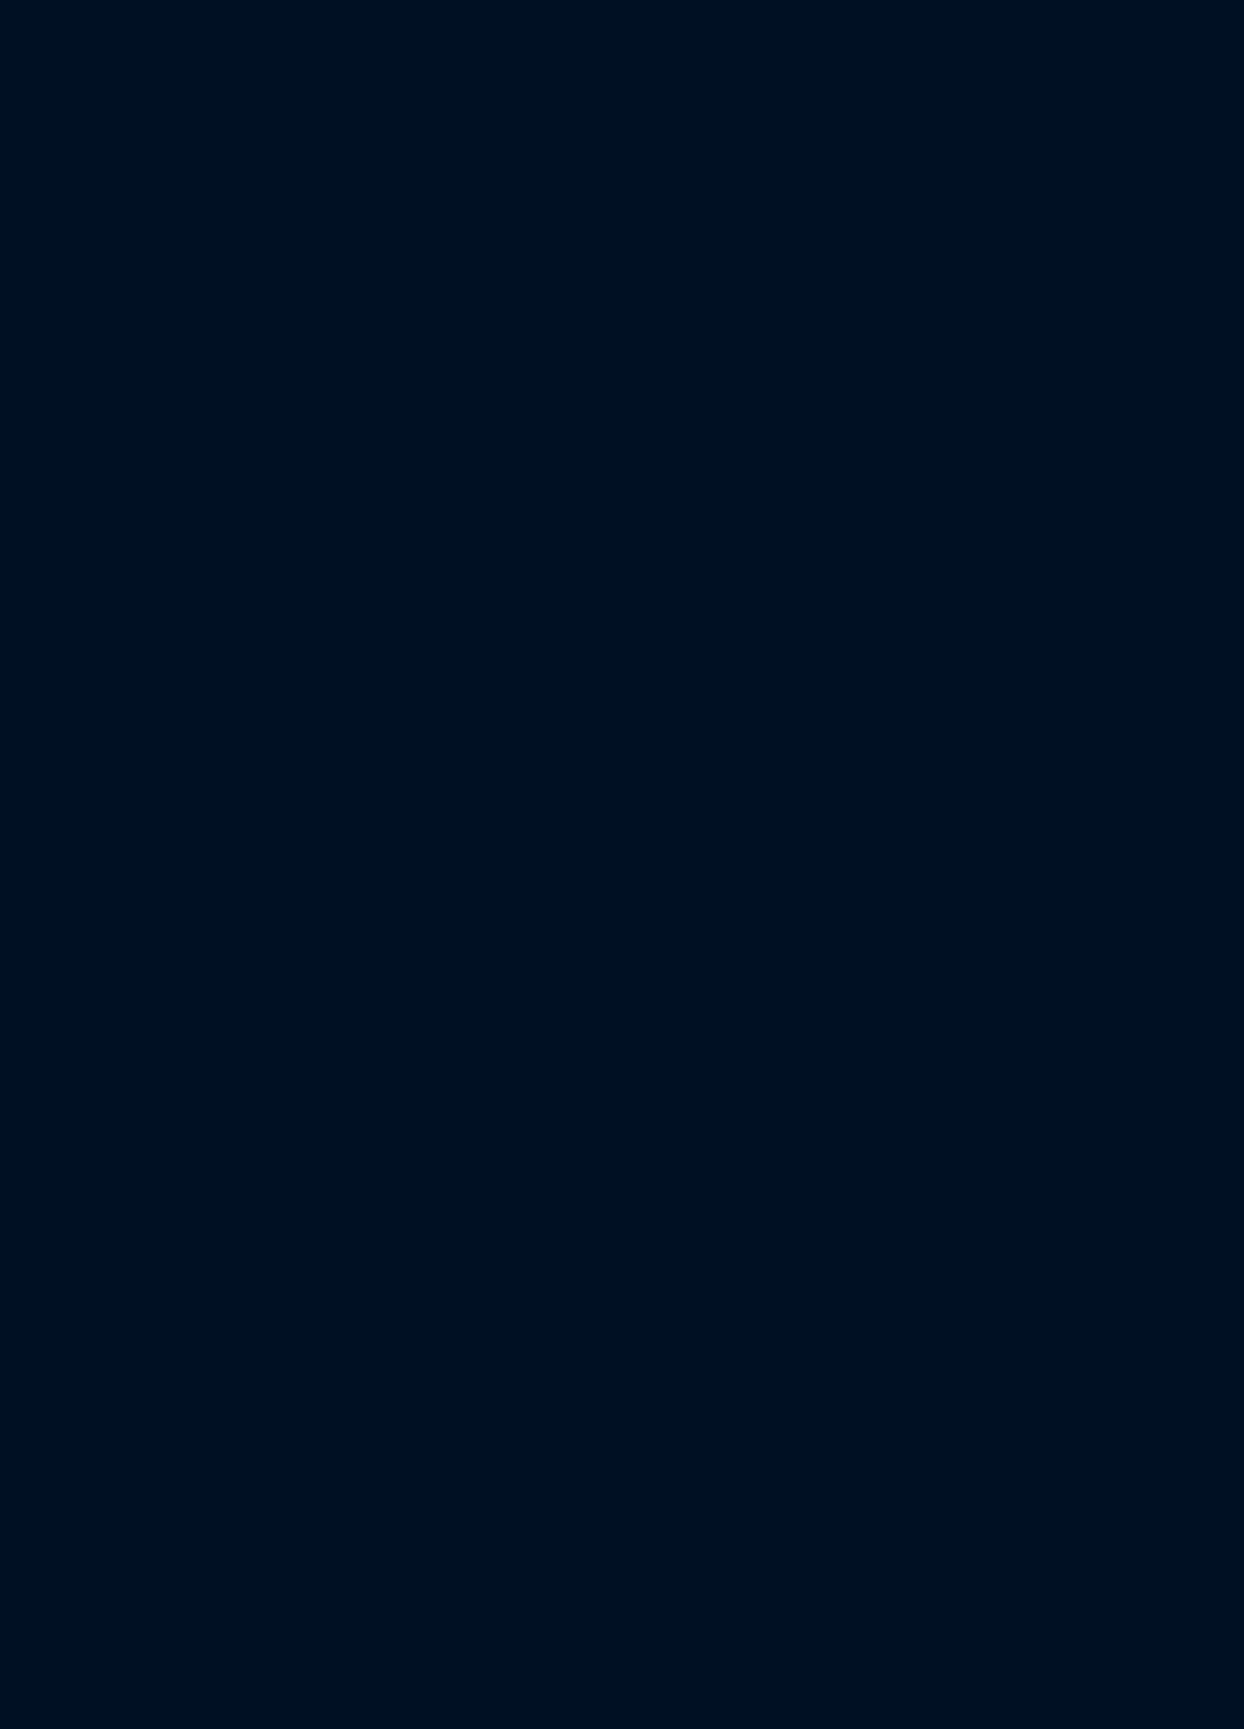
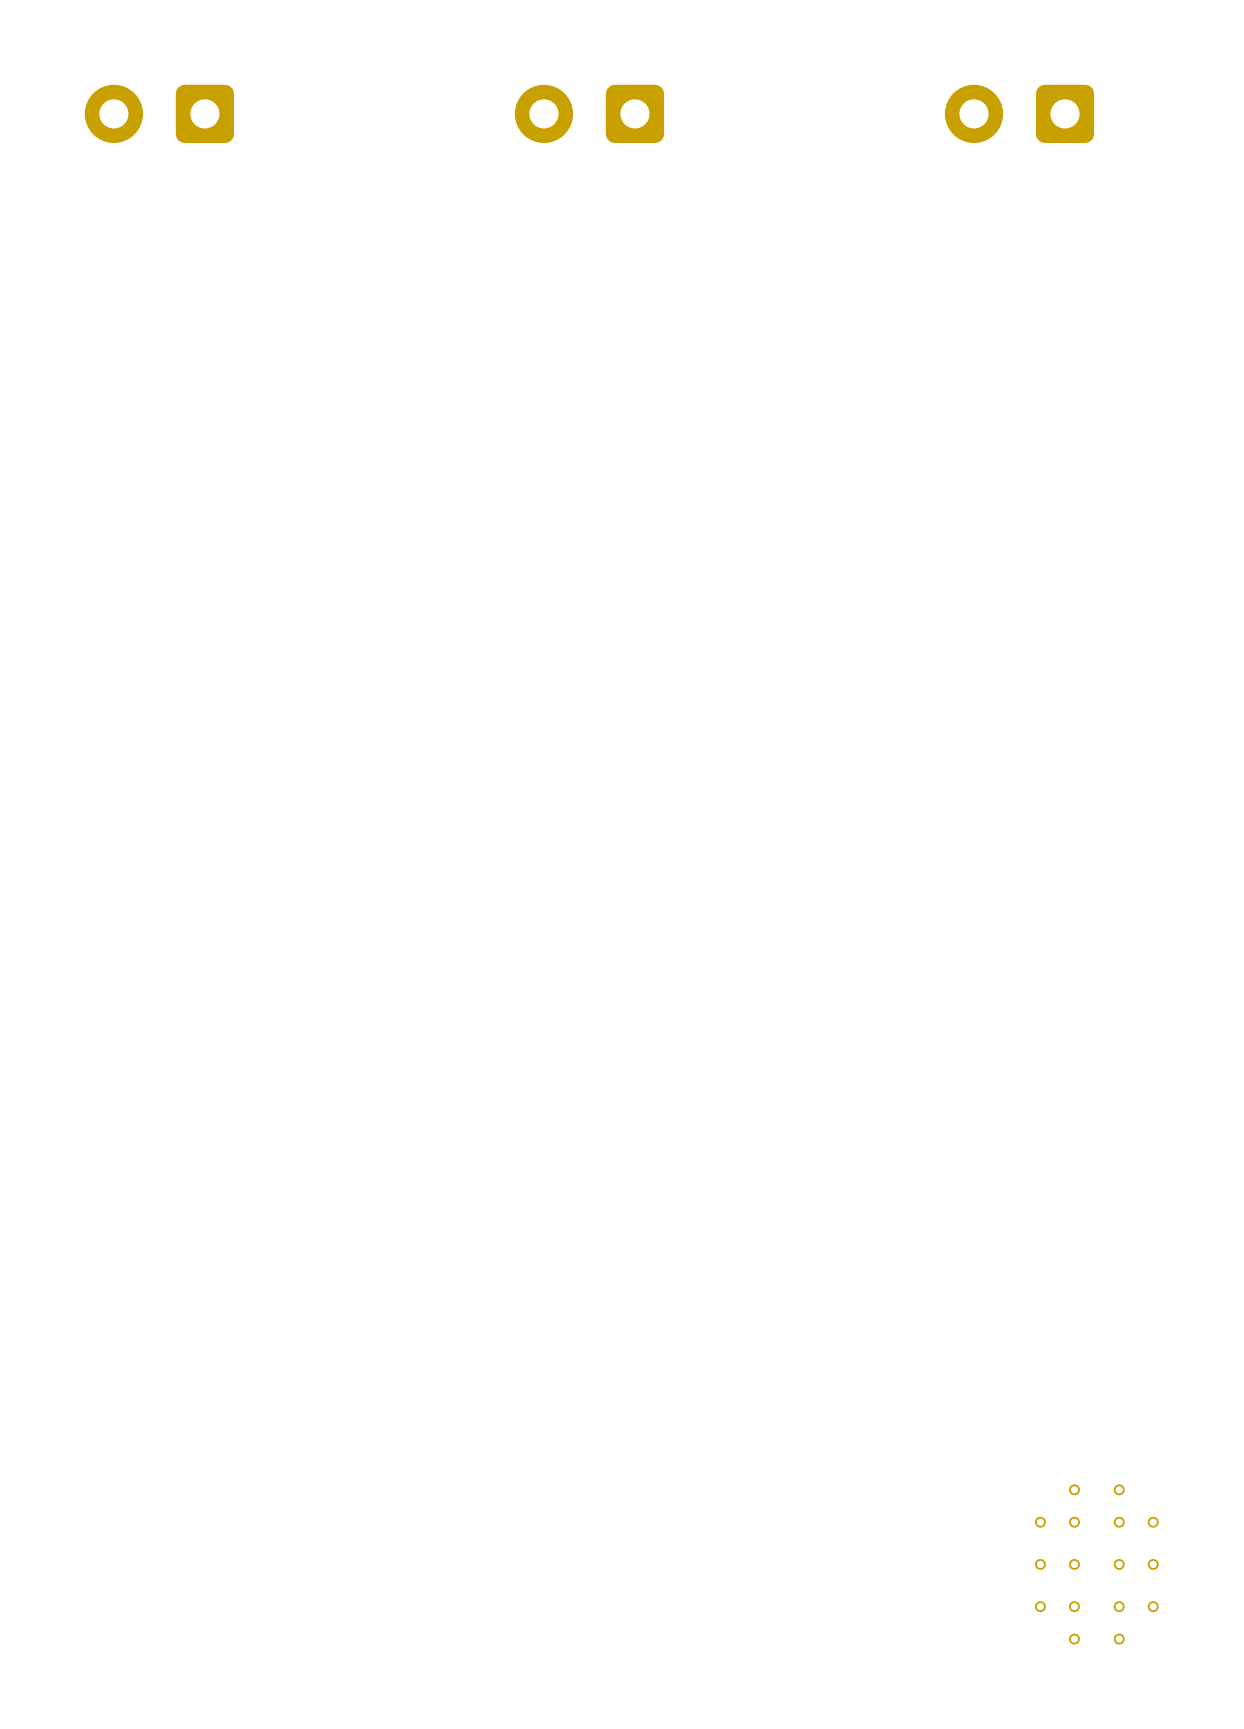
part: none -> (159, 113)
part: none -> (589, 113)
part: none -> (1019, 113)
part: none -> (1096, 1564)

